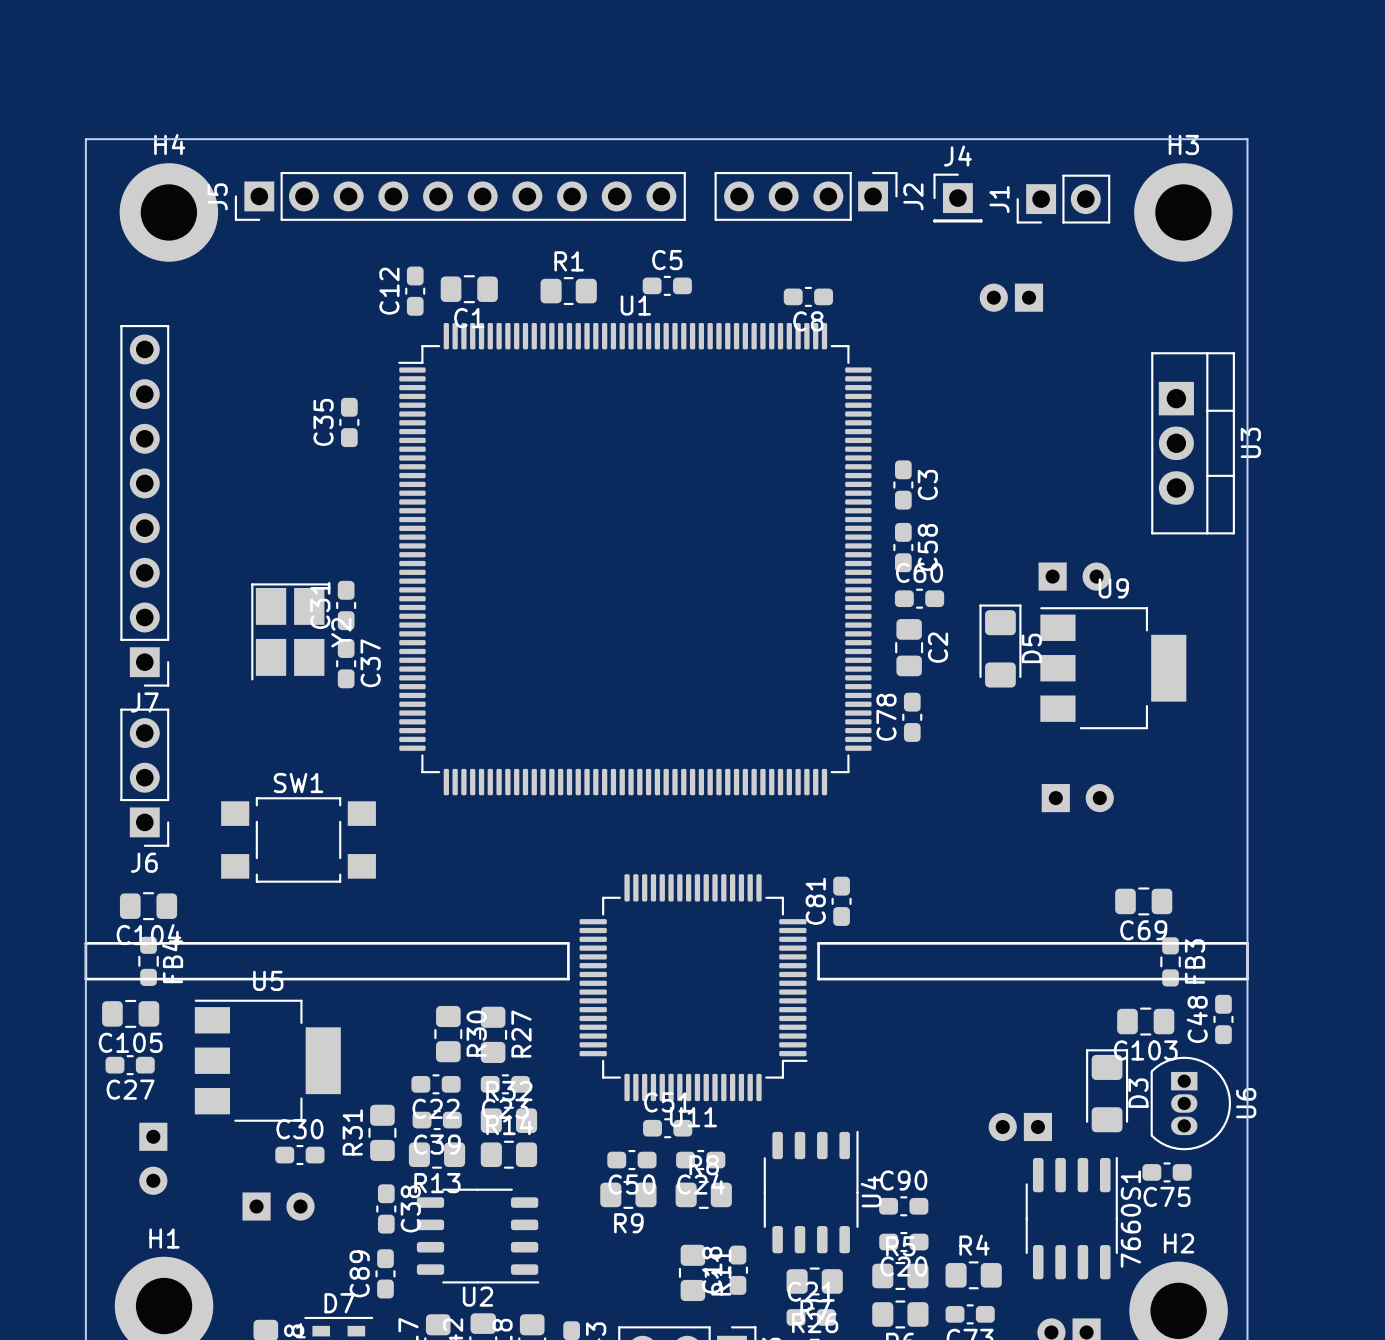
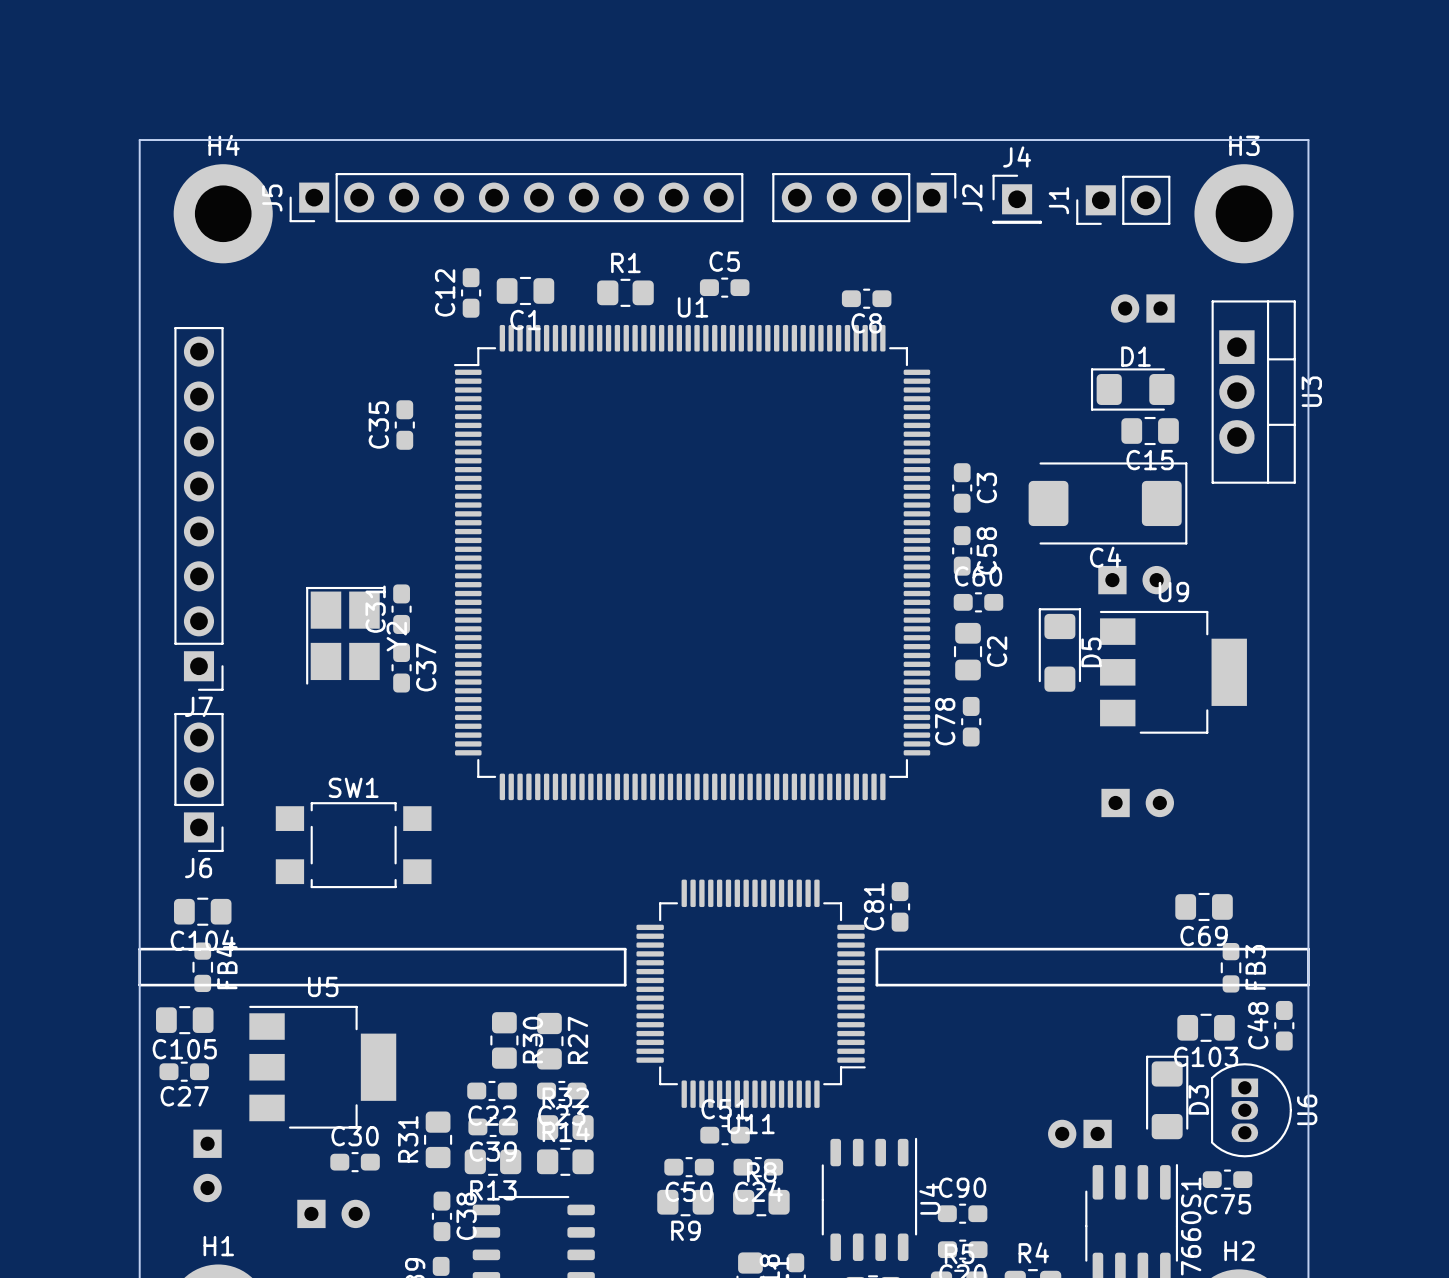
part position: (1011, 297) -> (1142, 308)
D1: none -> (1132, 389)
C15: none -> (1150, 431)
U3 position: (1193, 443) -> (1253, 392)
C4: none -> (1107, 503)

